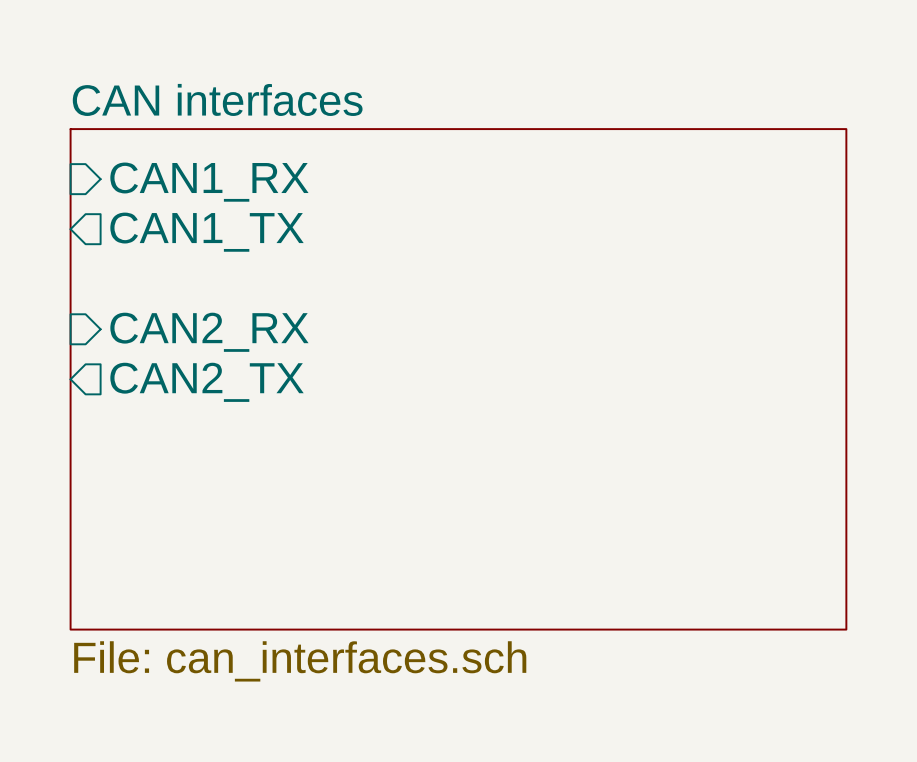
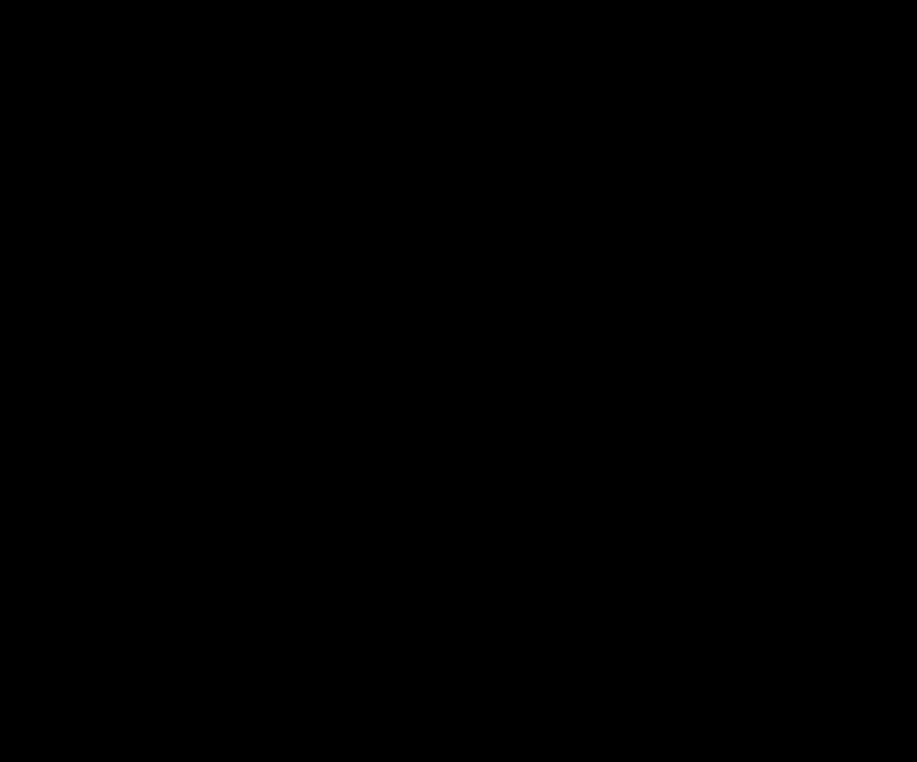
sheet pin: CAN1_RX (209, 182) -> none
sheet pin: CAN1_TX (207, 232) -> none
sheet pin: CAN2_RX (209, 332) -> none
sheet CAN interfaces: File: can_interfaces.sch (458, 379) -> none
sheet pin: CAN2_TX (207, 382) -> none

